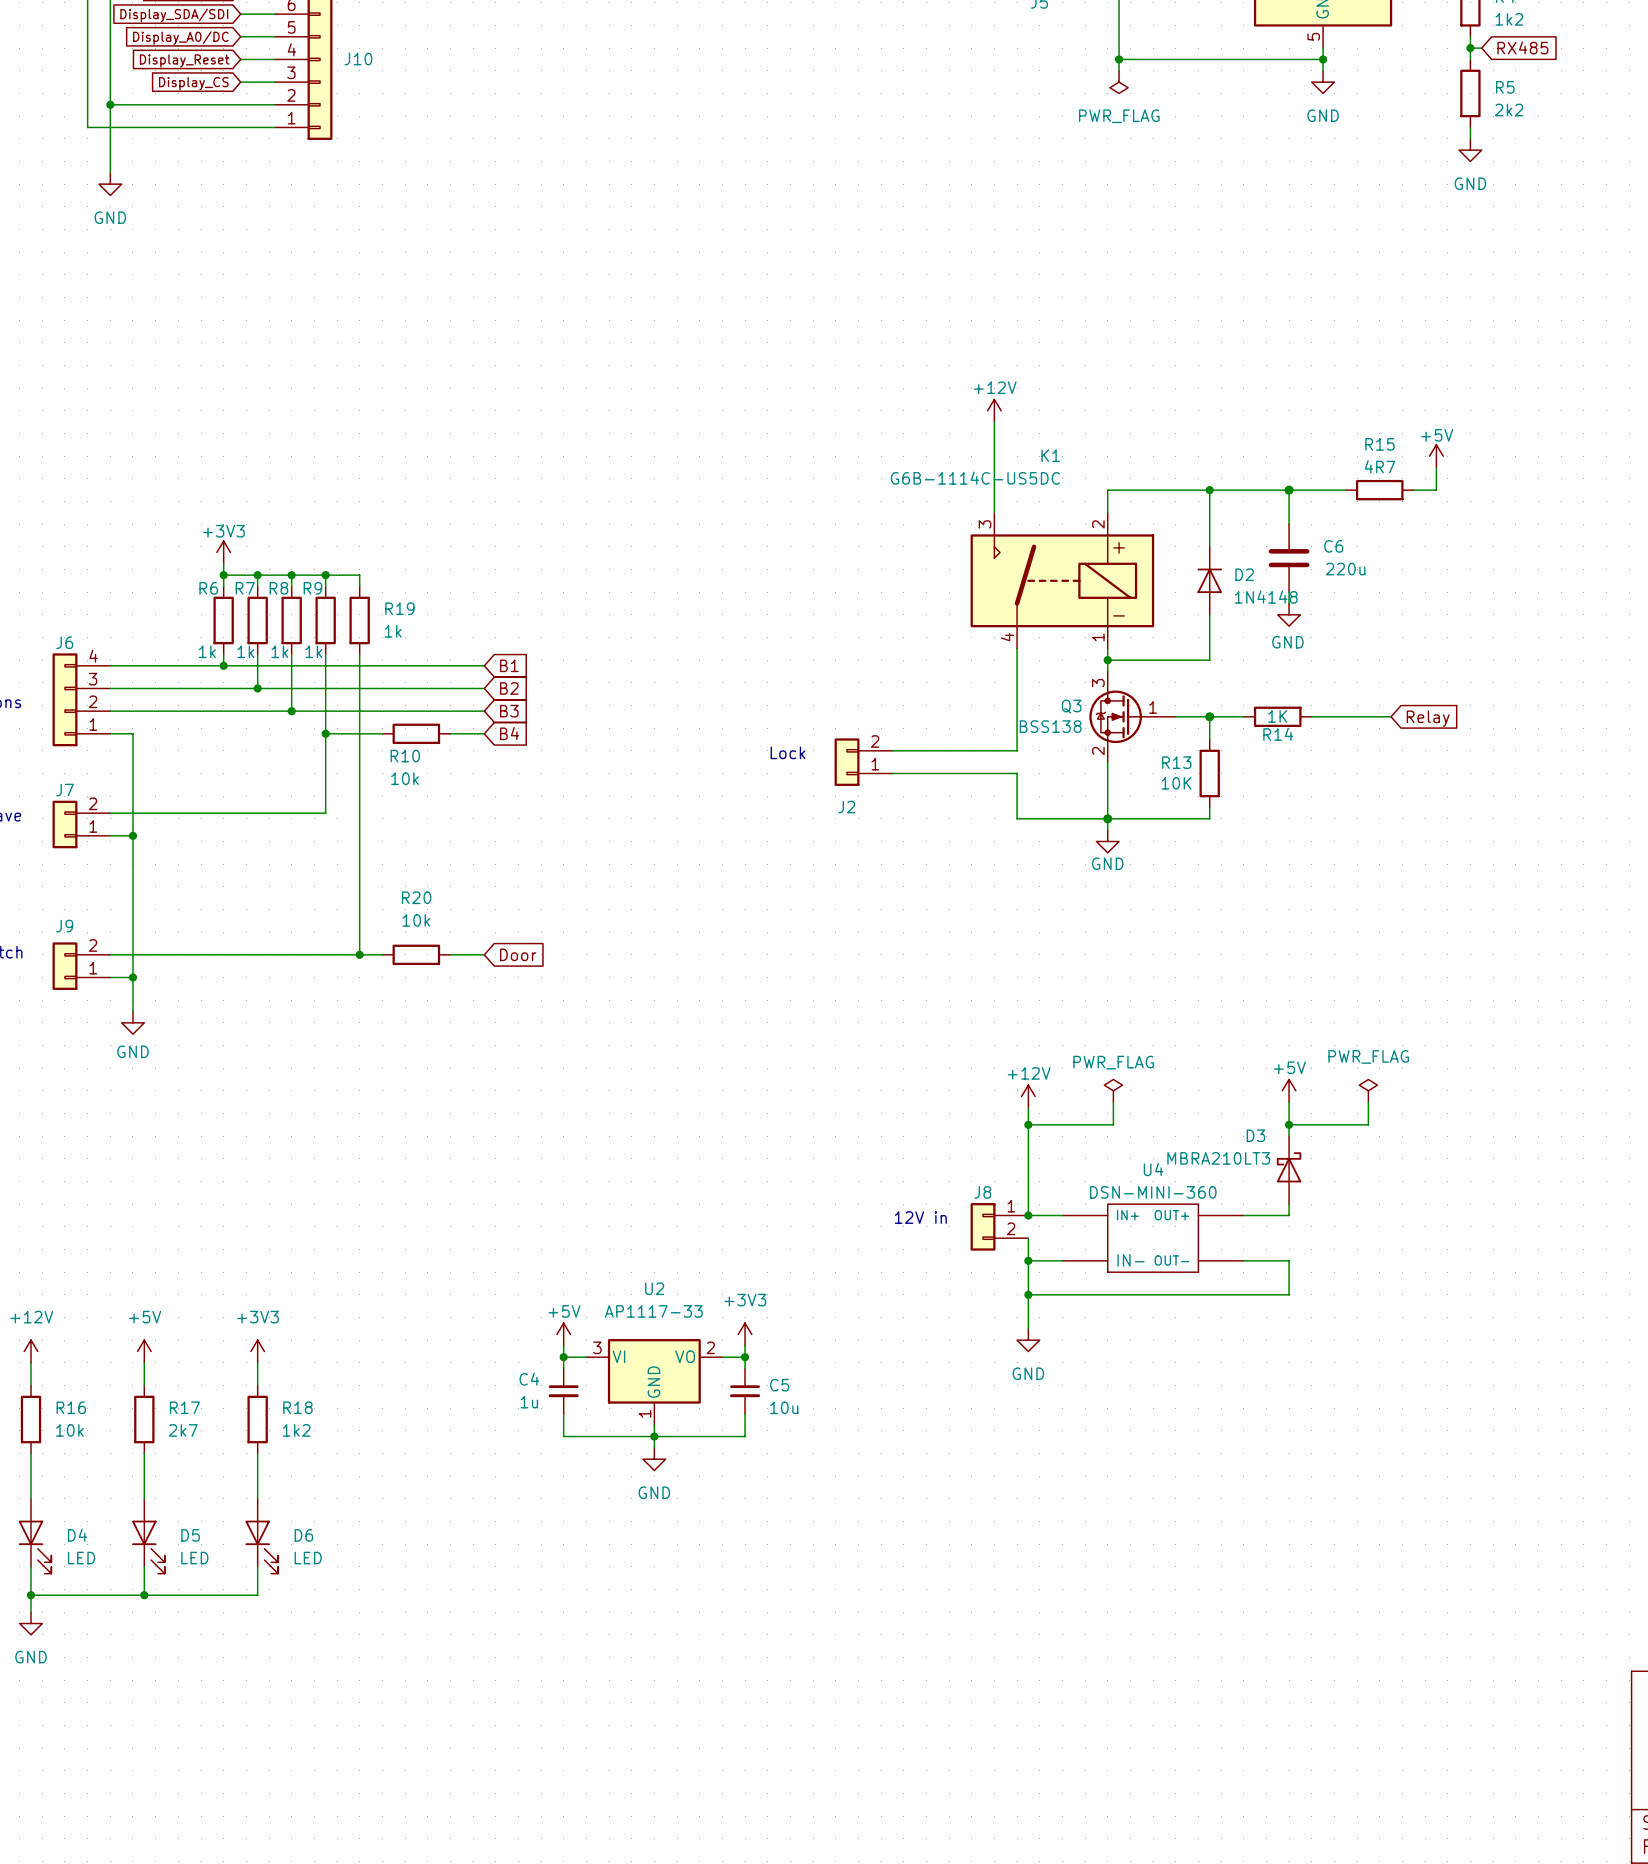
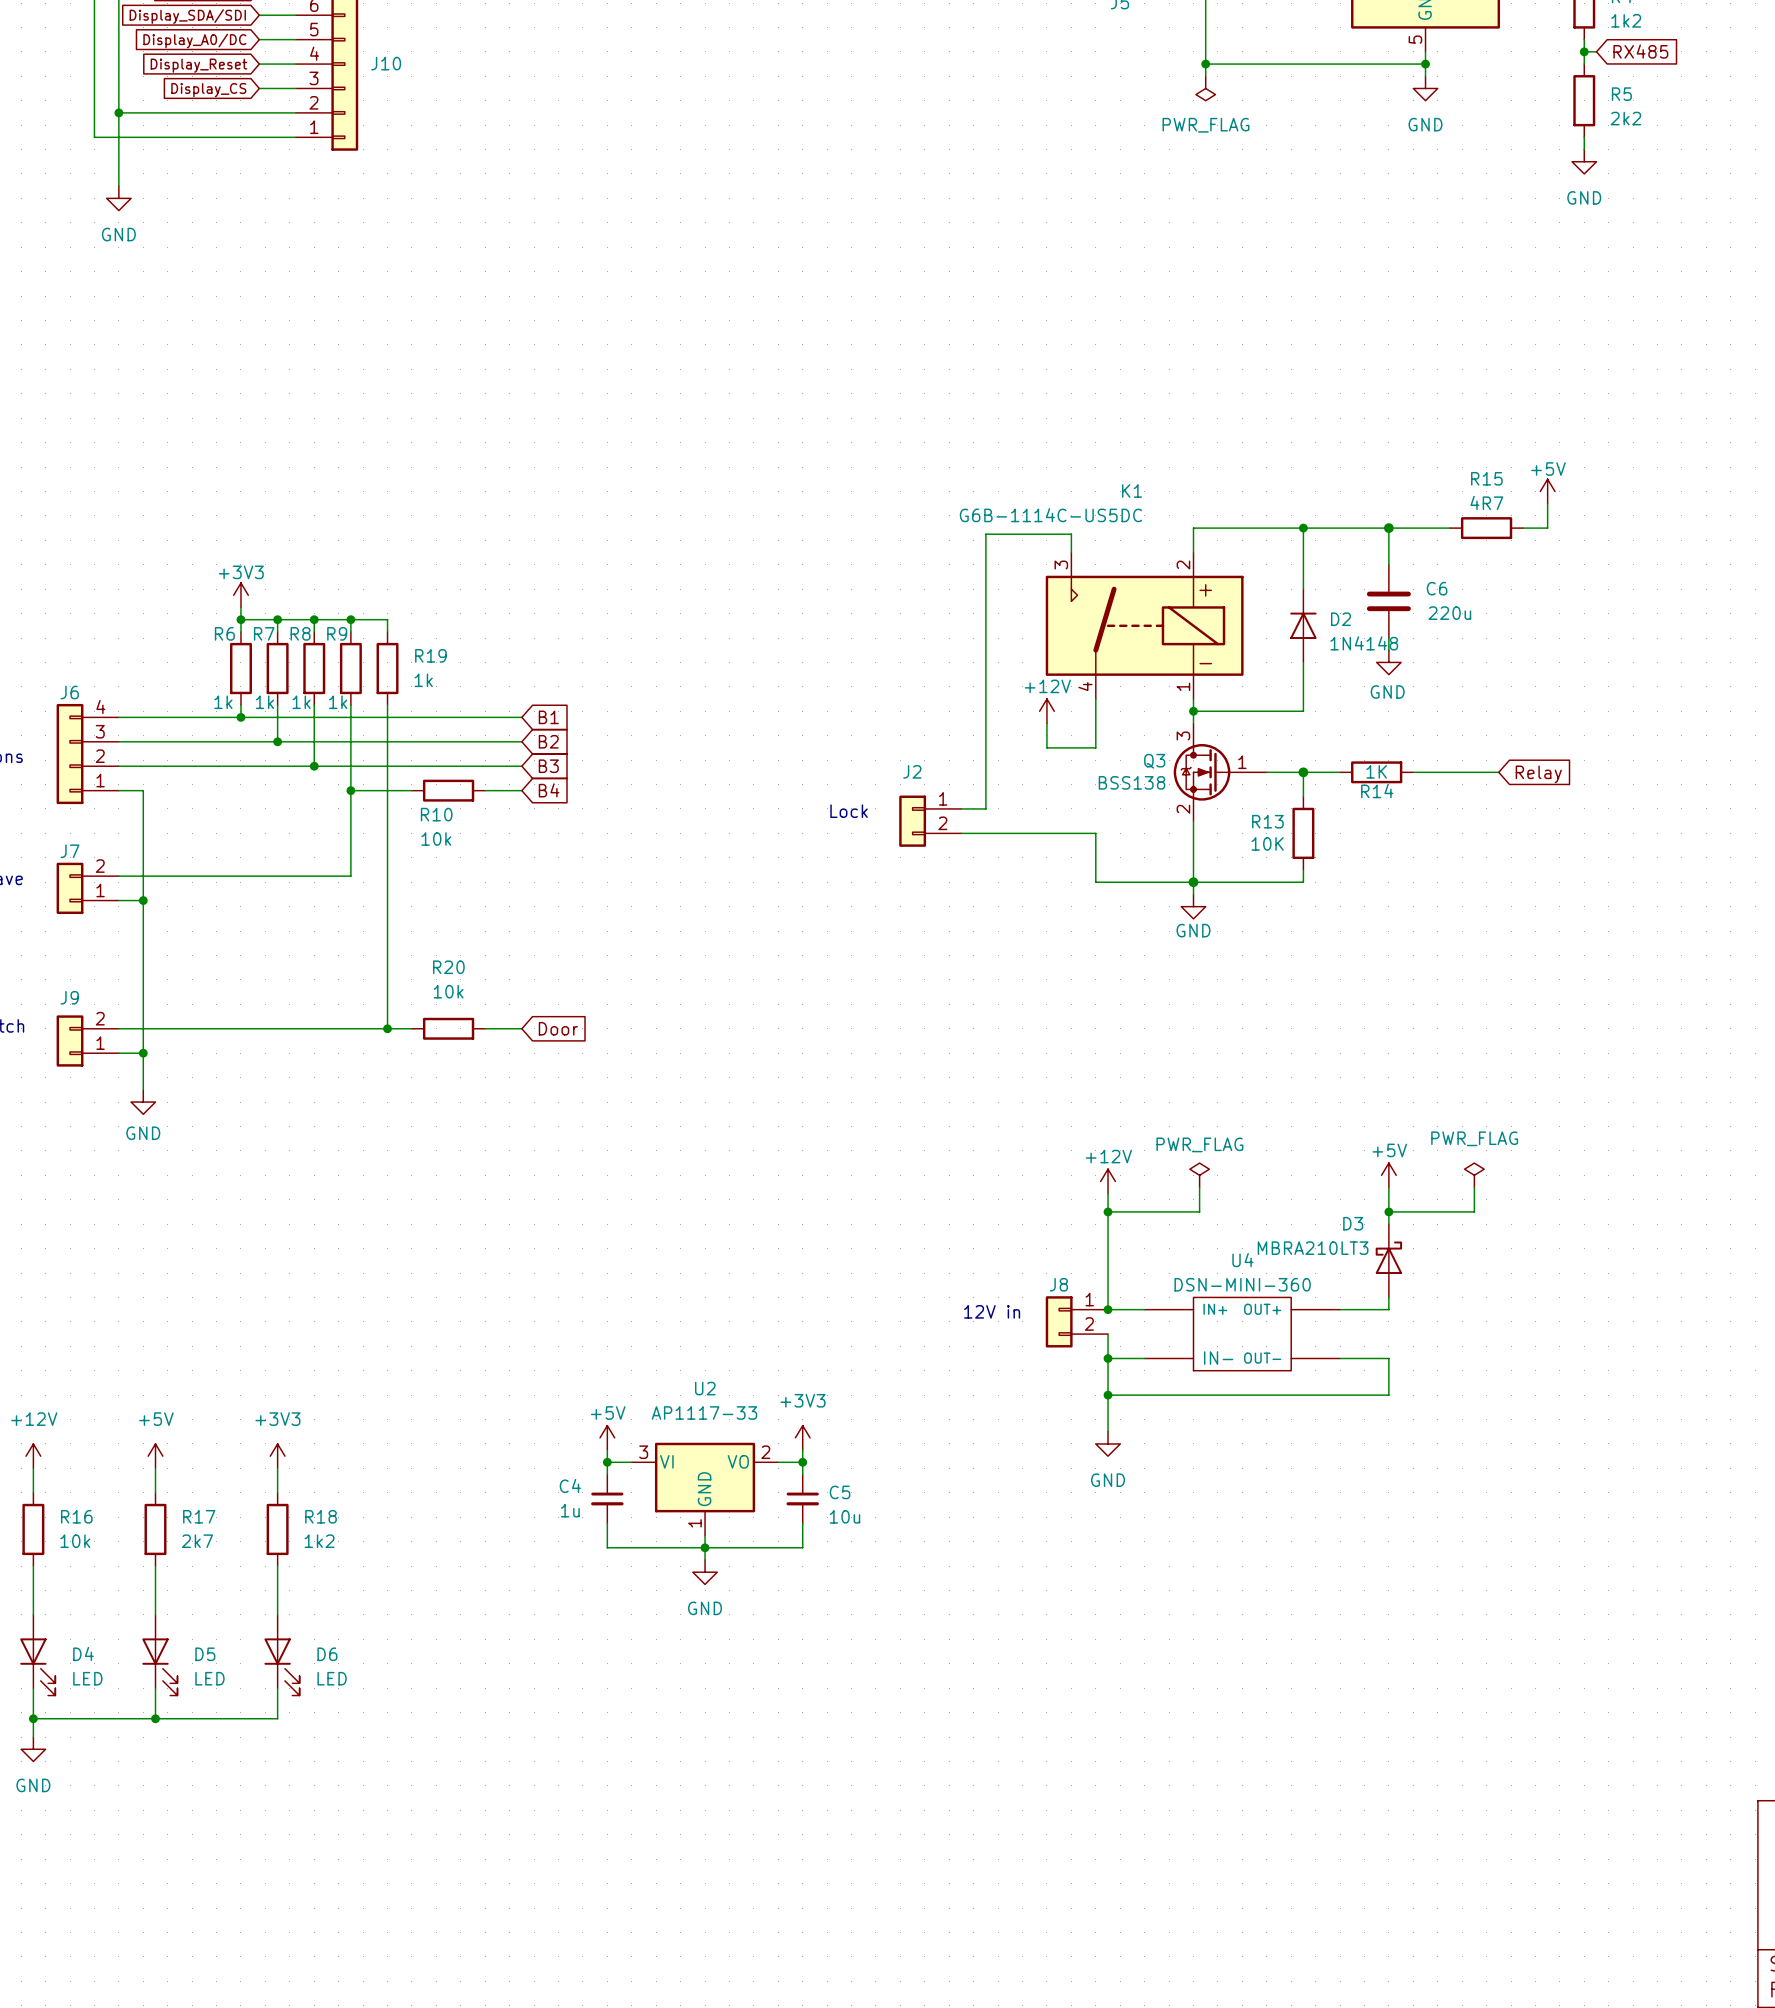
power symbol: +12V (994, 410) -> none
wire: (994, 422) (994, 495) -> (985, 808) (985, 534) (1071, 534)
power symbol: none -> +12V (1046, 711)
wire: (1017, 694) (1017, 750) (915, 750) -> (1095, 747) (1046, 747) (1046, 723)
J2 flip: as is (847, 762) -> up-down (912, 821)

